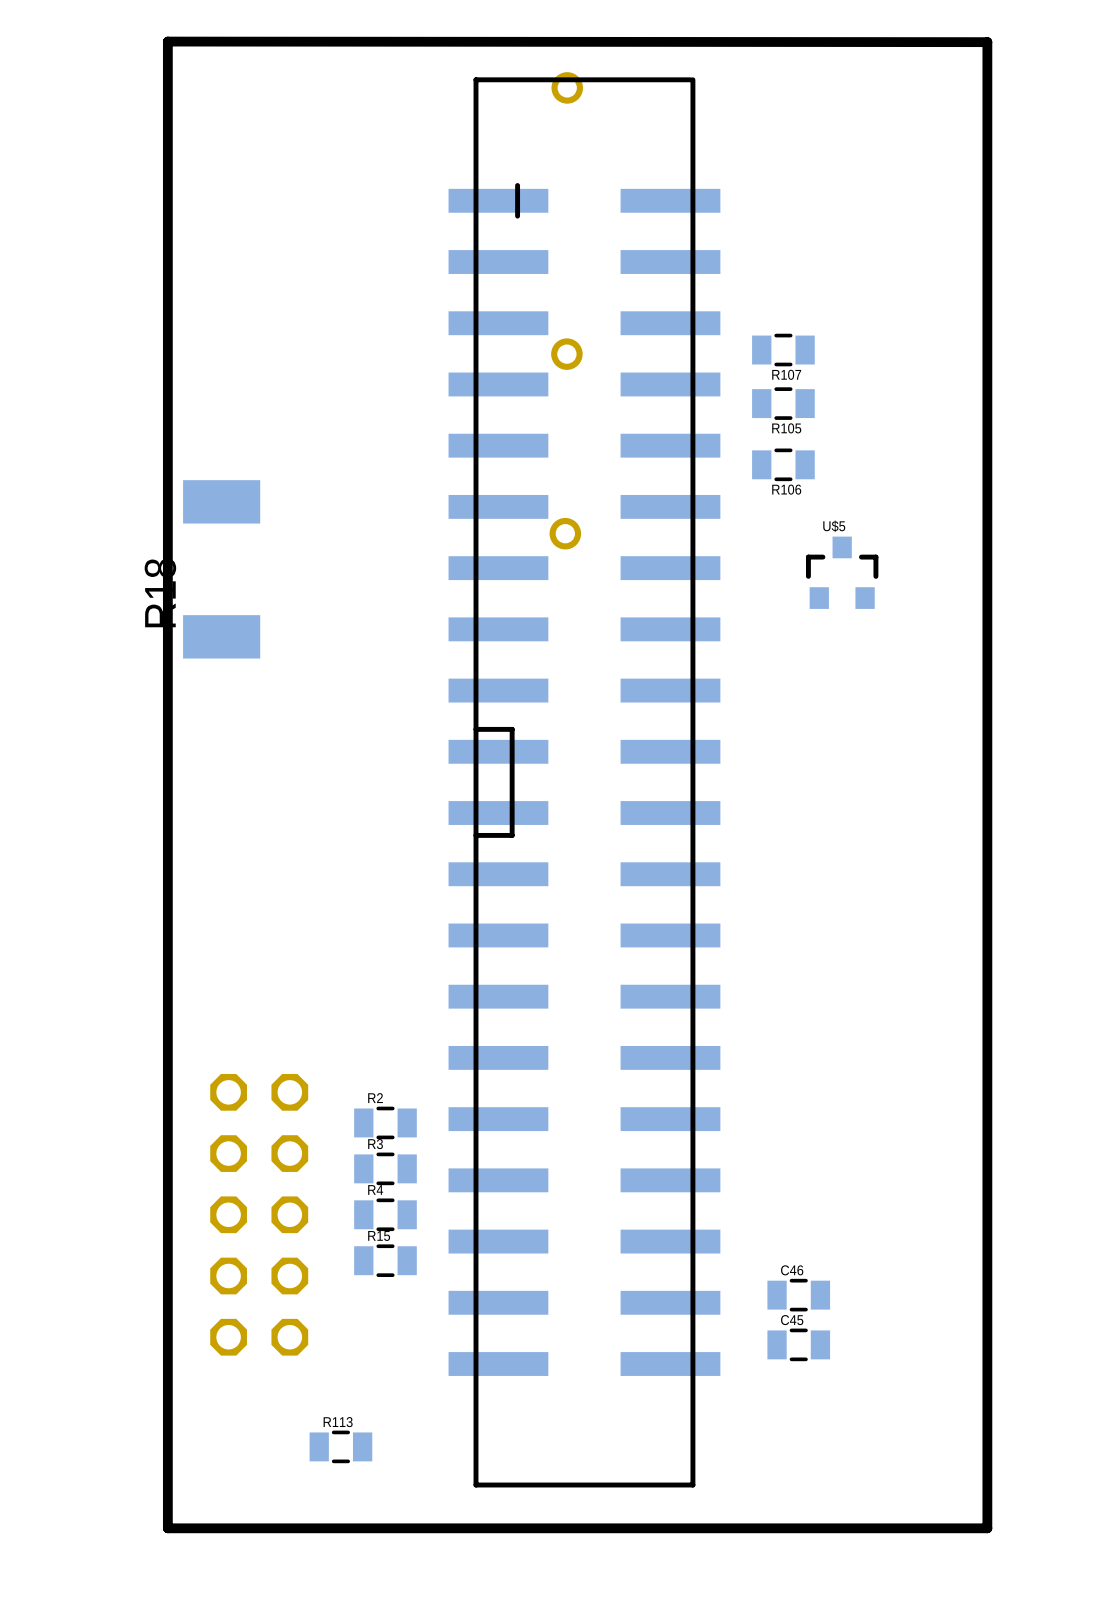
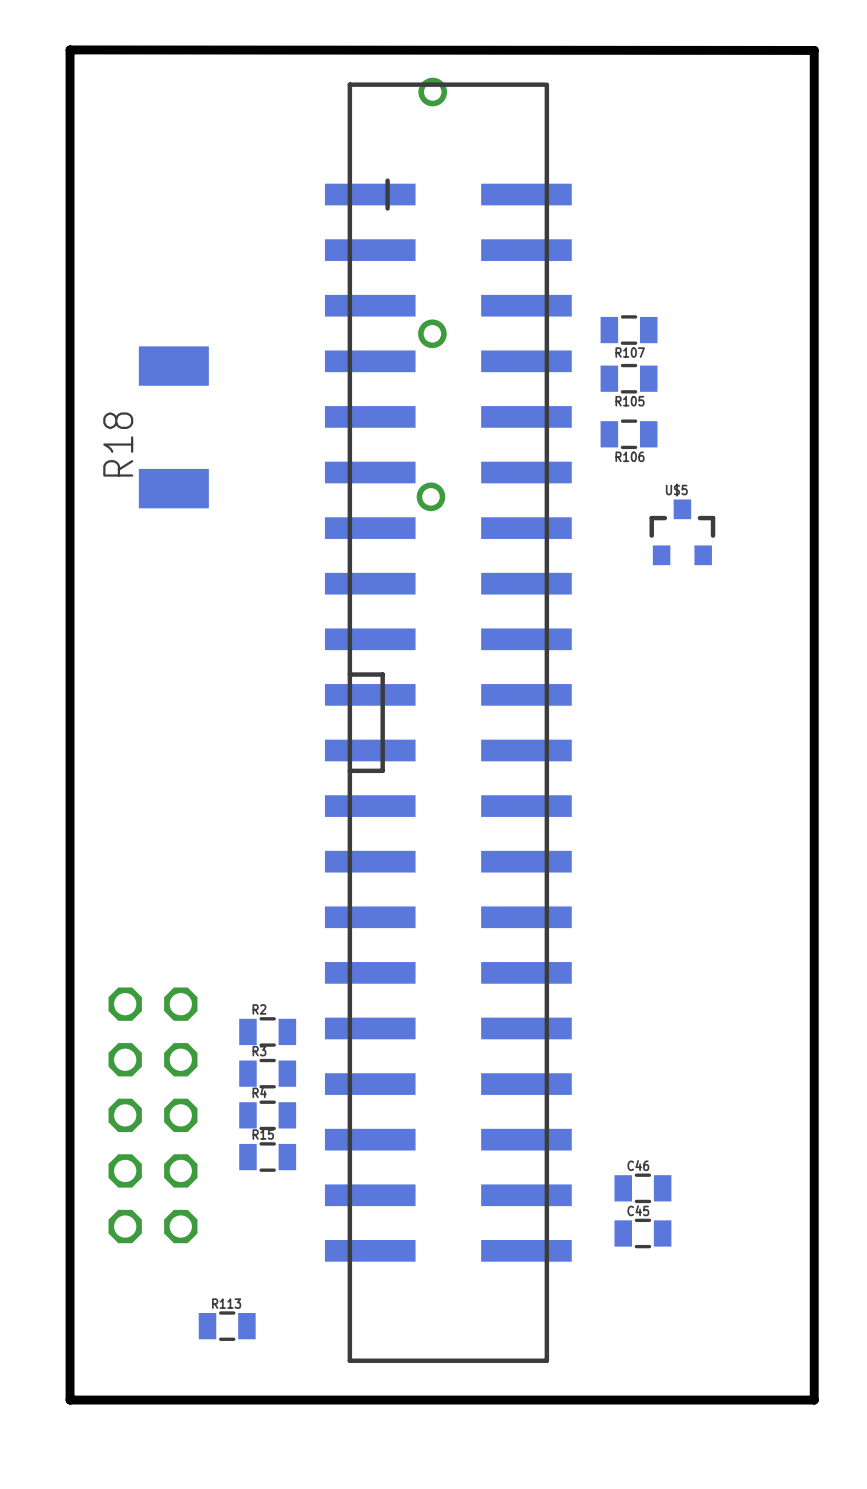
R18 position: (221, 569) -> (173, 427)

